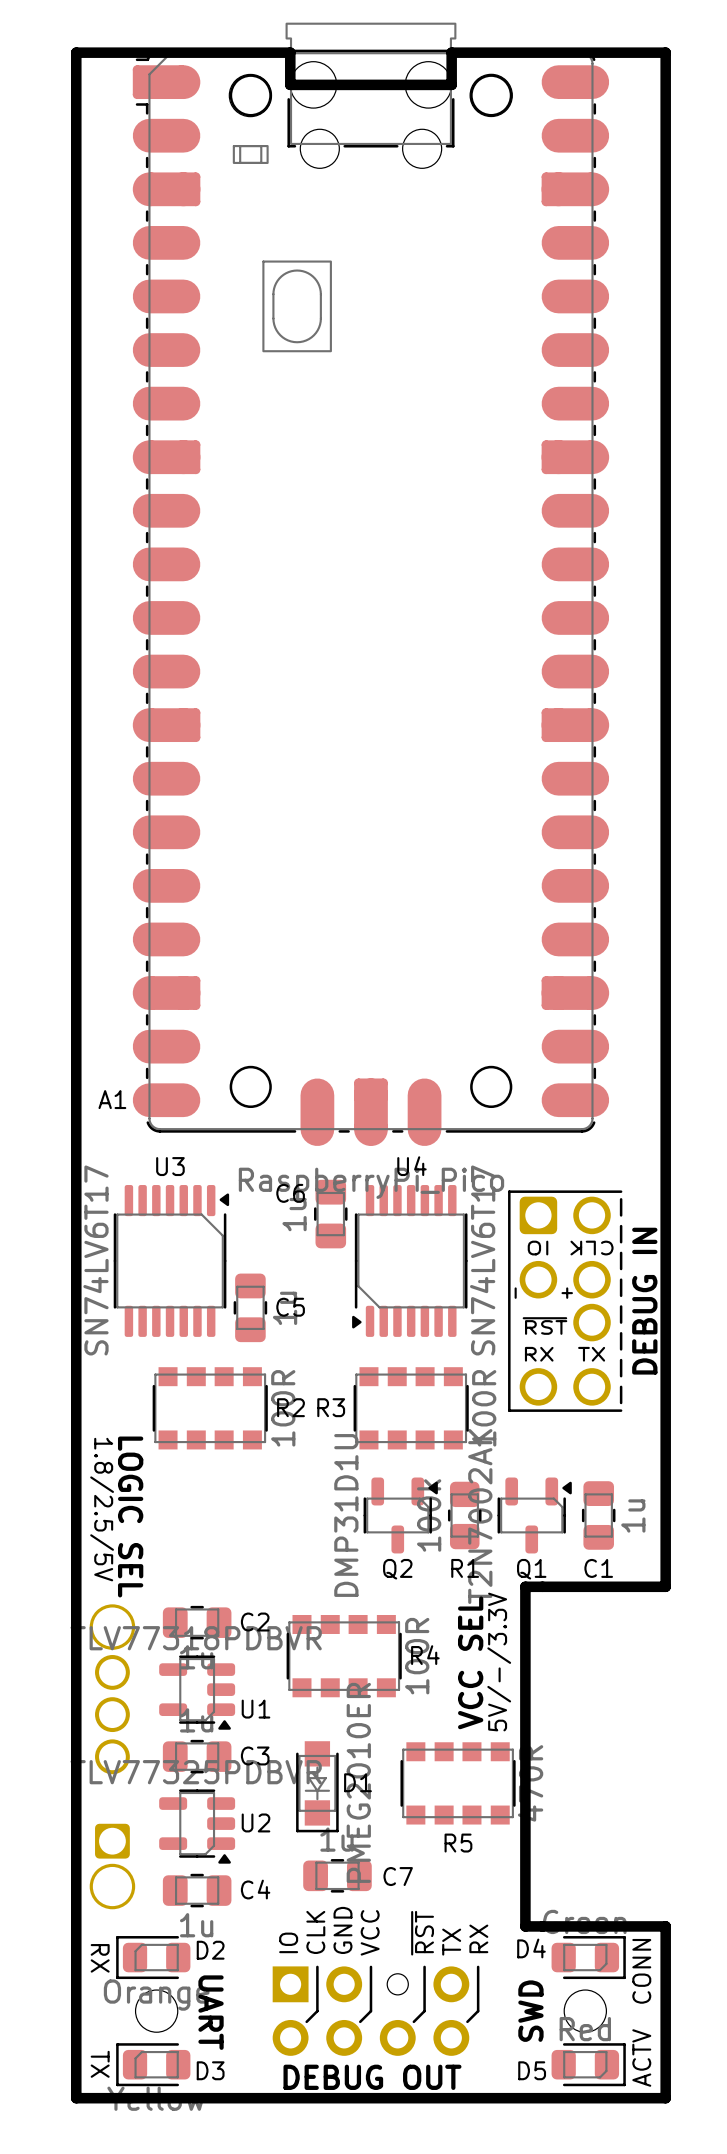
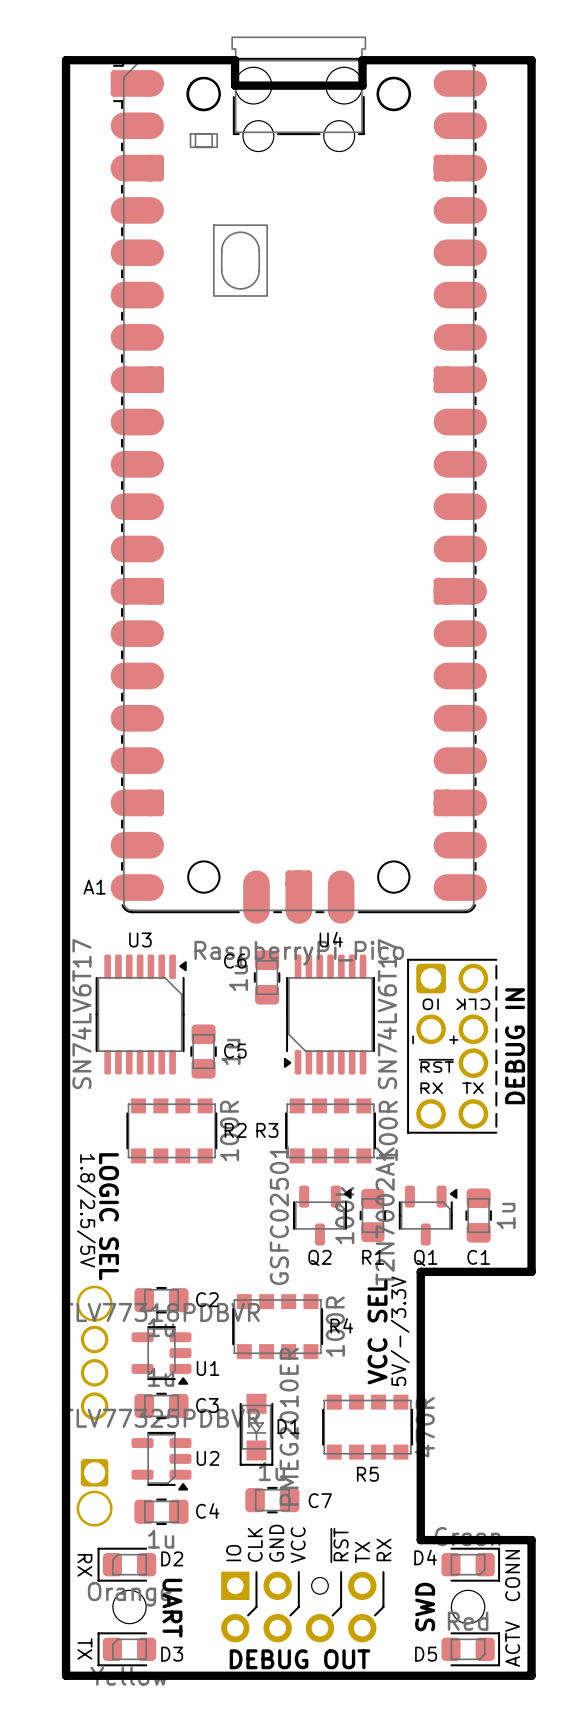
Q2 value: DMP31D1U (346, 1515) -> GSFC02501 (279, 1215)

